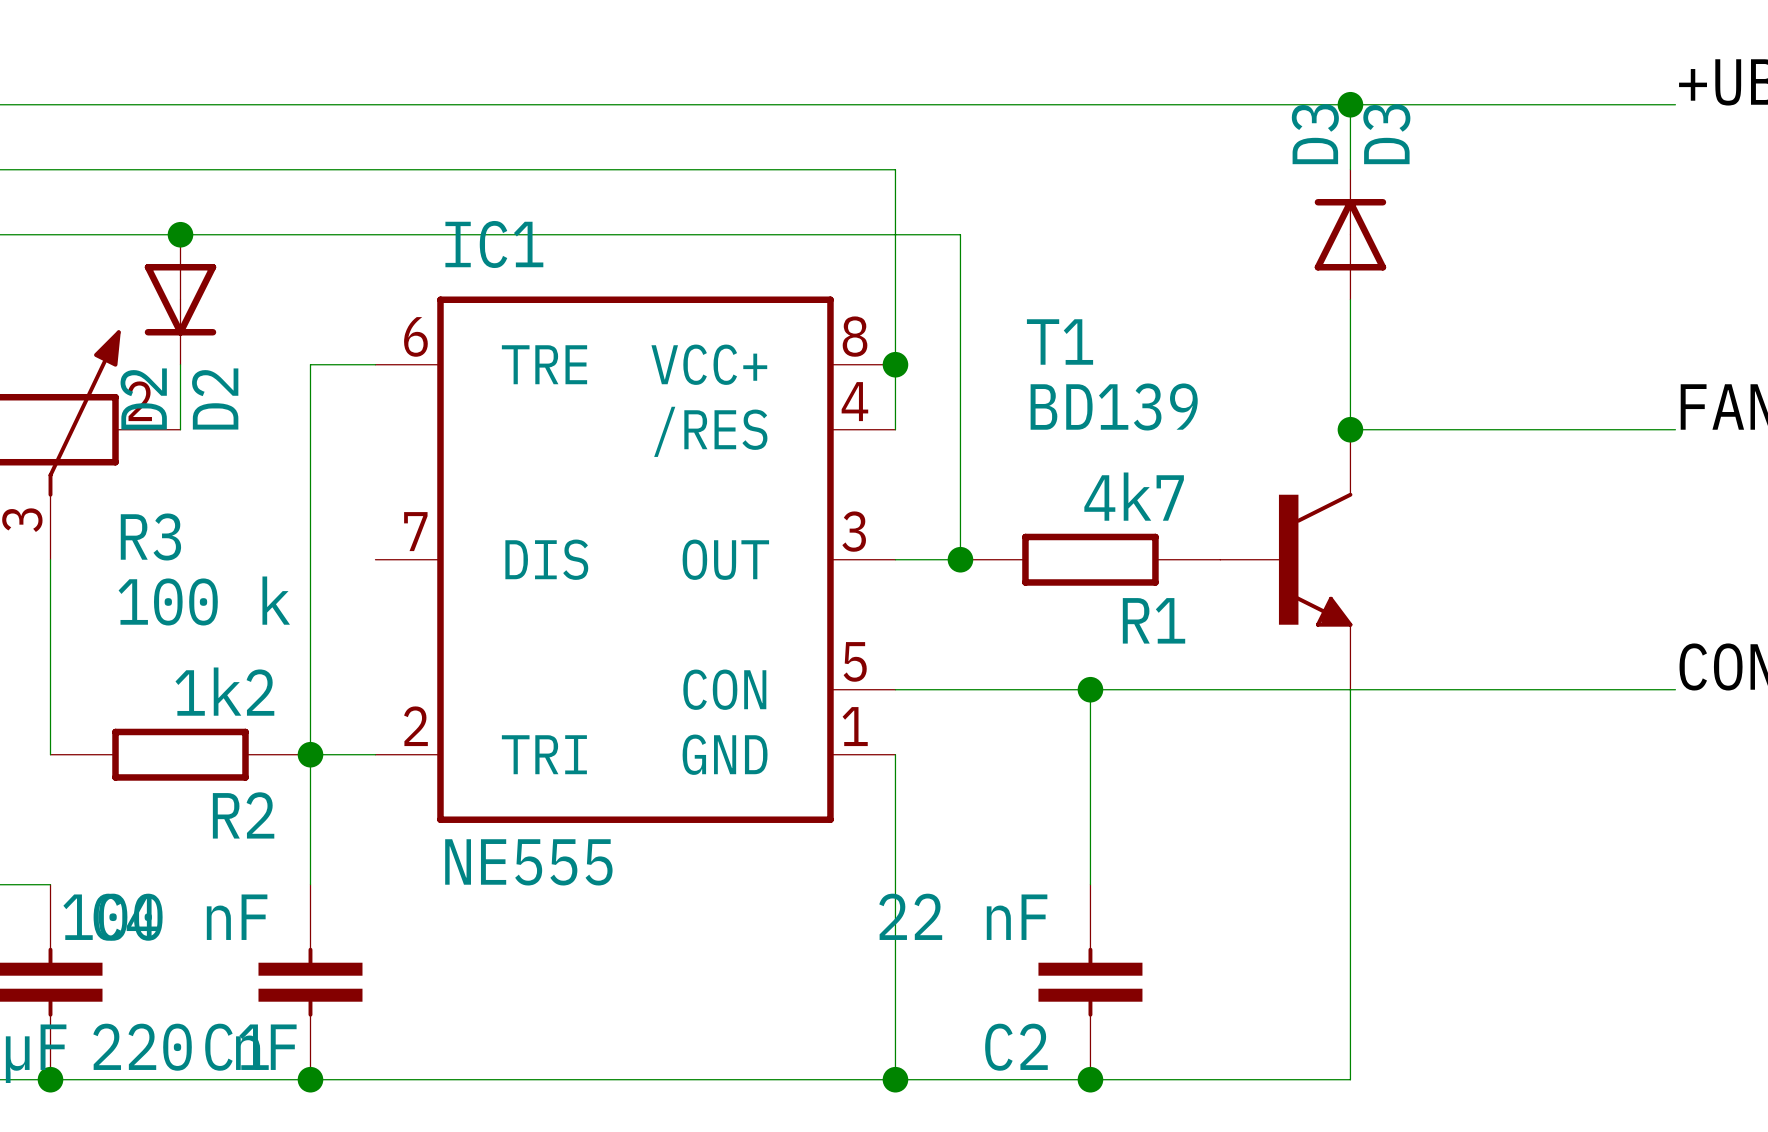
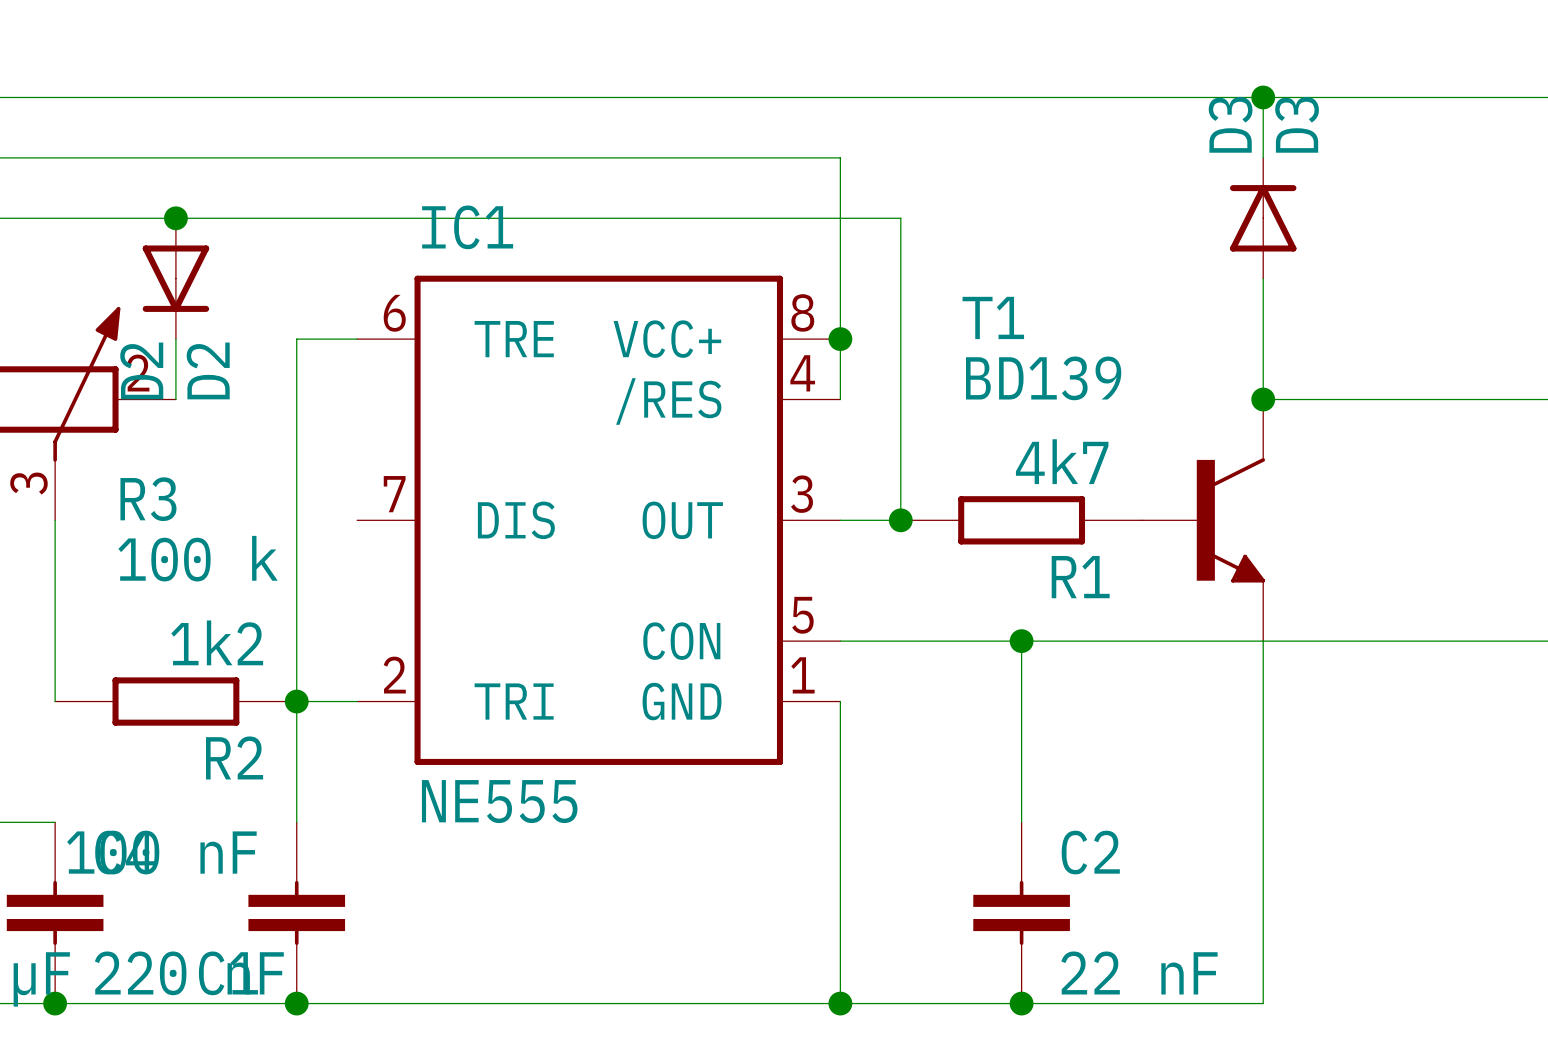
C2 value position: 22 nF (963, 916) -> 22 nF (1139, 972)
C2 name position: C2 (1016, 1047) -> C2 (1090, 852)

